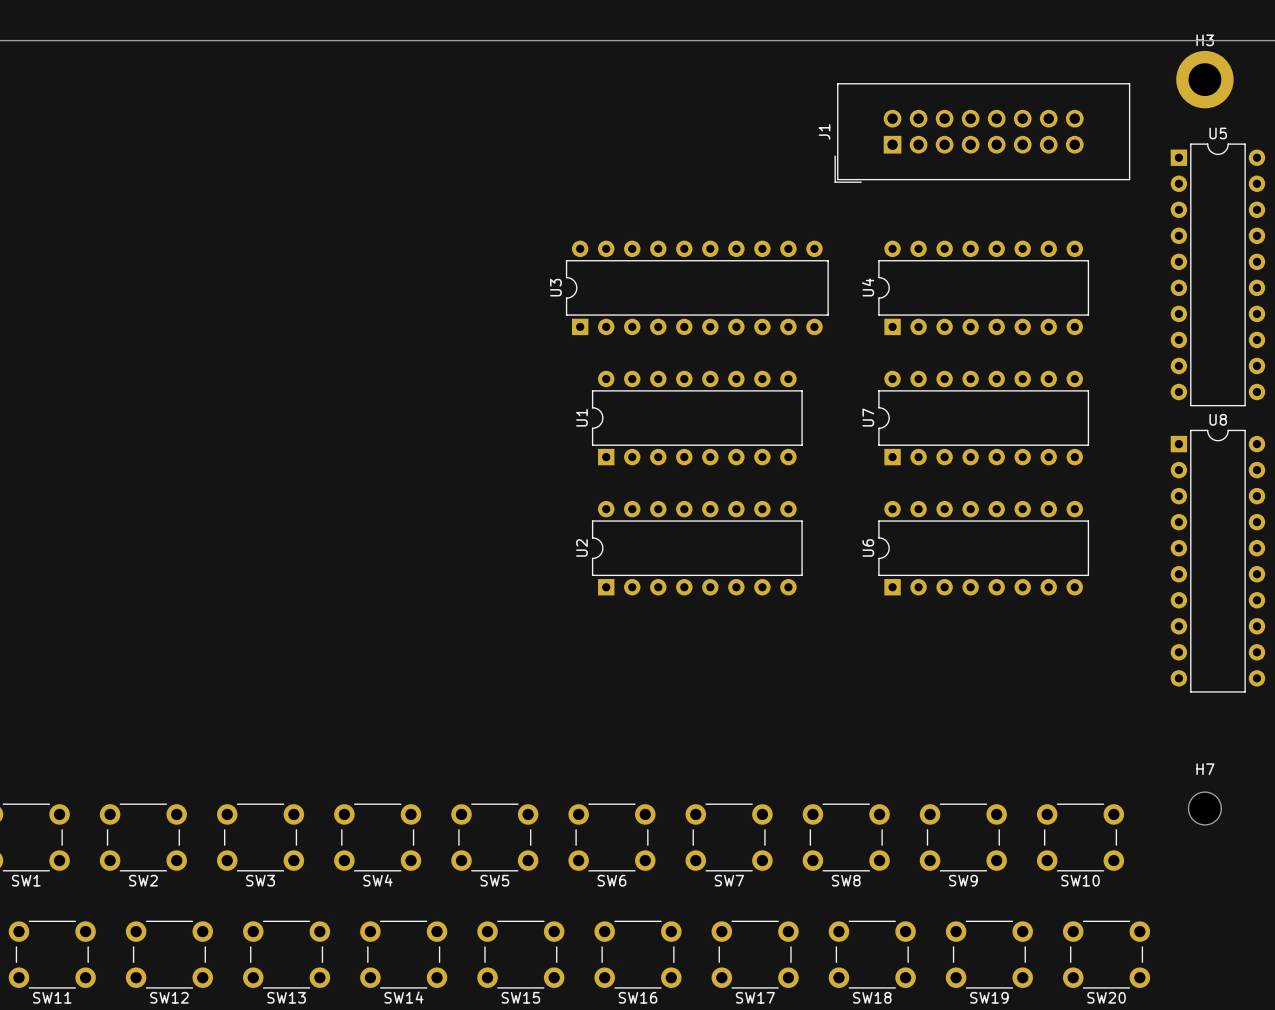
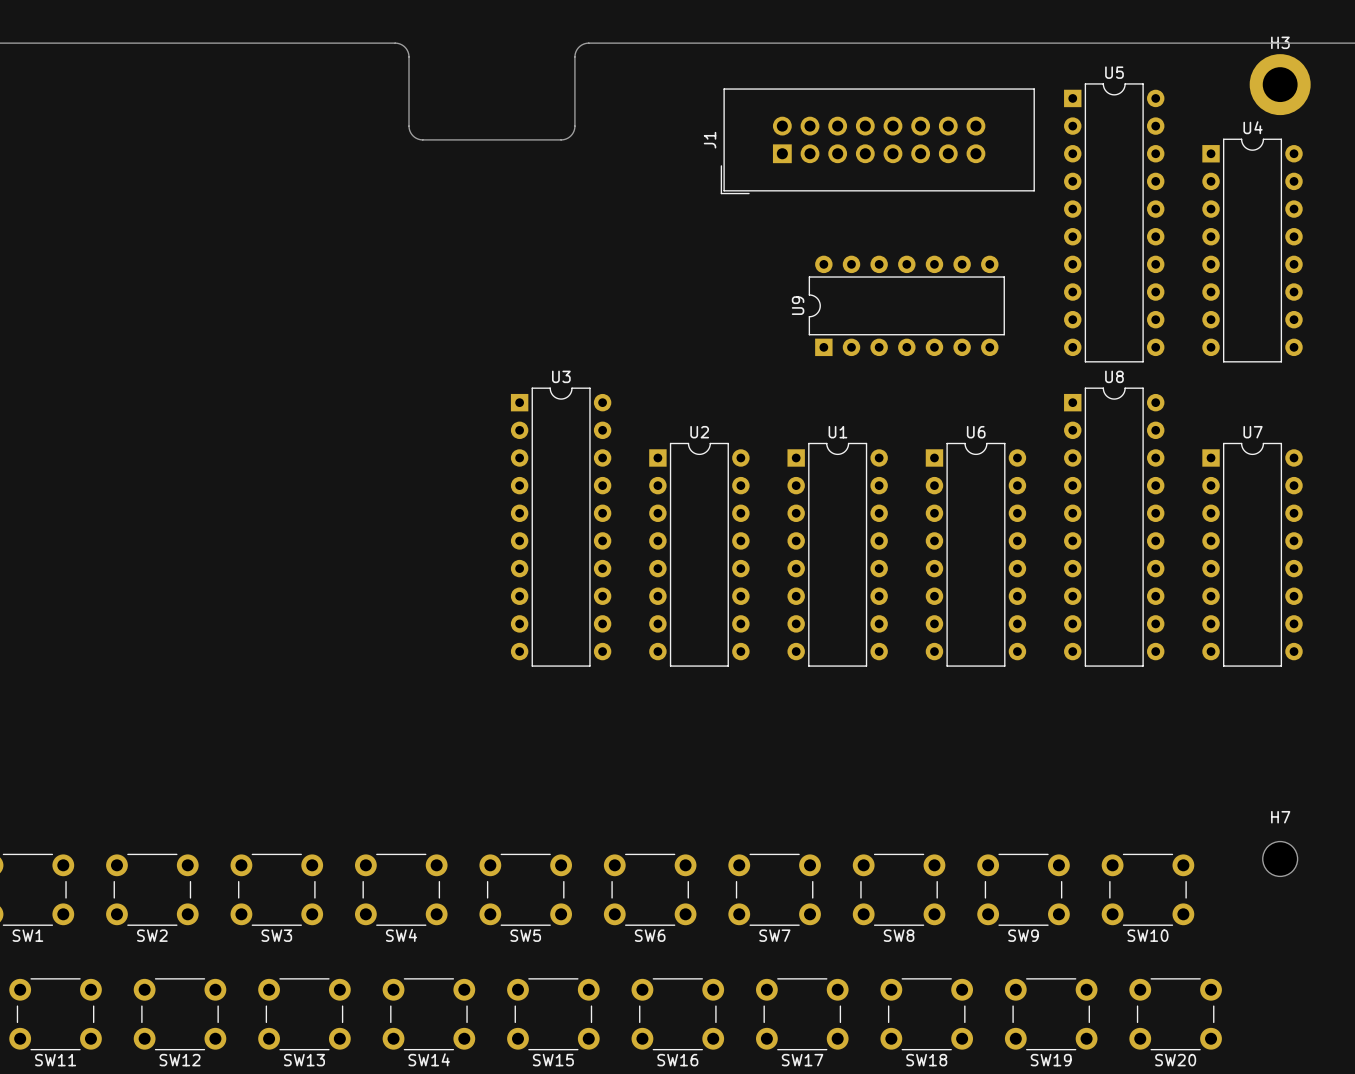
board edge: (371, 40) (554, 40) -> (395, 43) (403, 45) (408, 53) (409, 127) (413, 135) (422, 139) (561, 139) (568, 138) (574, 127) (575, 53) (580, 45) (588, 43)
J1 position: (982, 132) -> (877, 141)
U5 position: (1217, 274) -> (1114, 222)
U3 rotation: 0° (697, 287) -> 90° clockwise (561, 527)
U3 position: (697, 287) -> (561, 527)
U9: none -> (906, 305)
U4 rotation: 0° (983, 287) -> 90° clockwise (1252, 250)
U4 position: (983, 287) -> (1252, 250)
U1 rotation: 0° (697, 418) -> 90° clockwise (837, 554)
U1 position: (697, 418) -> (837, 554)
U7 rotation: 0° (983, 418) -> 90° clockwise (1252, 554)
U7 position: (983, 418) -> (1252, 554)
U2 rotation: 0° (697, 548) -> 90° clockwise (699, 554)
U6 rotation: 0° (983, 548) -> 90° clockwise (975, 554)
U8 position: (1217, 561) -> (1114, 527)

